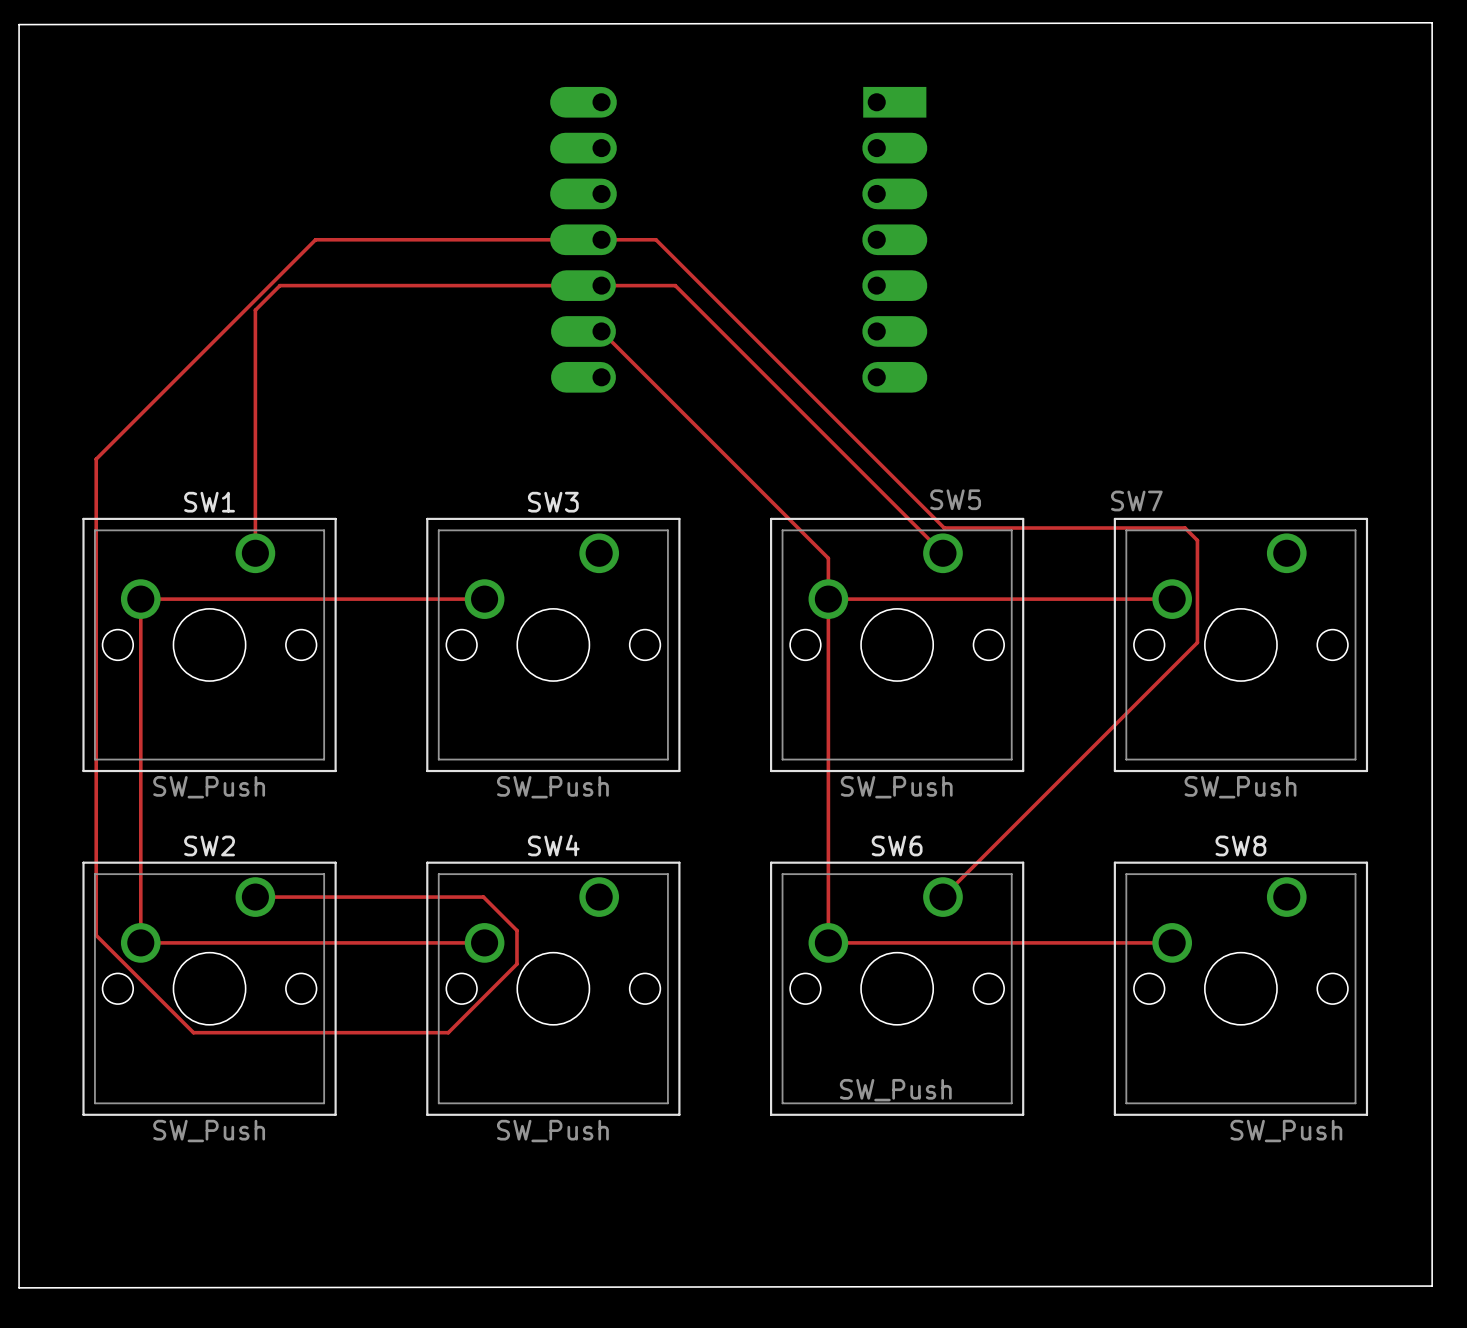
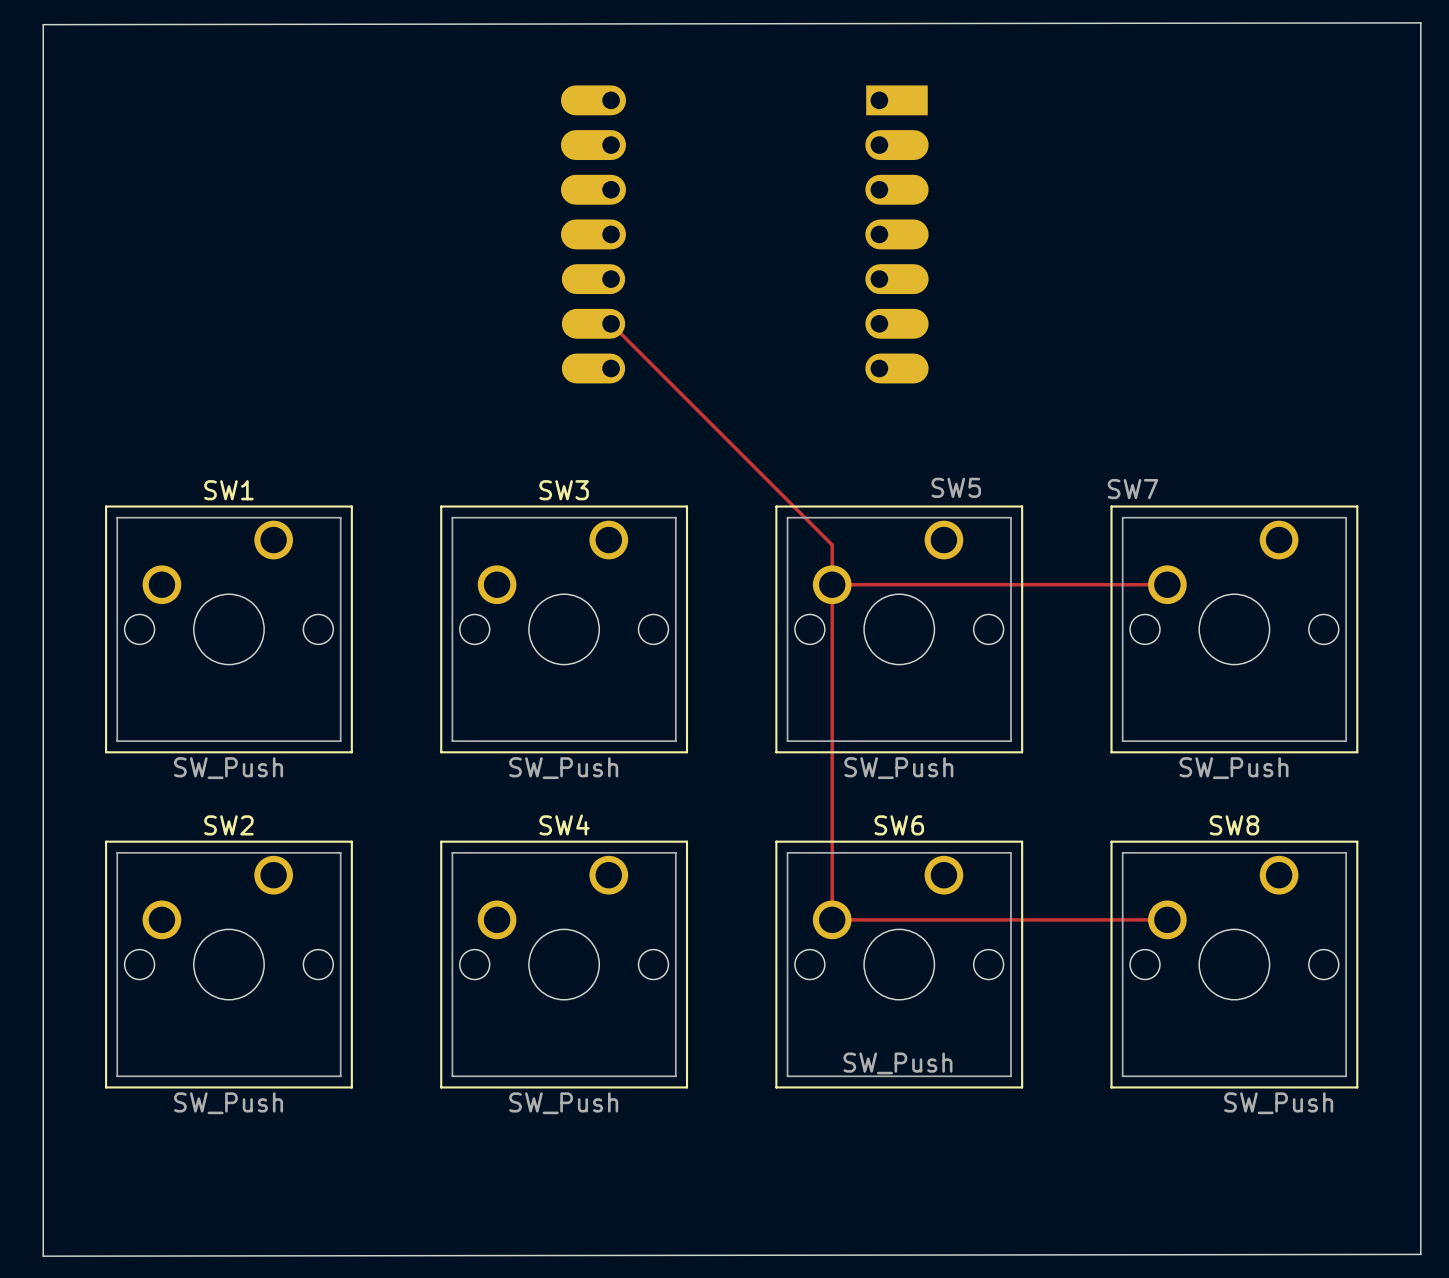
top track: (255, 553) (255, 310) (279, 285) (675, 285) (942, 553) -> none
top track: (484, 599) (140, 599) (140, 942) (484, 942) -> none
top track: (255, 897) (483, 897) (516, 930) (516, 964) (448, 1032) (193, 1032) (96, 935) (96, 459) (315, 239) (656, 239) (944, 528) (1185, 528) (1197, 540) (1197, 642) (942, 897) -> none

